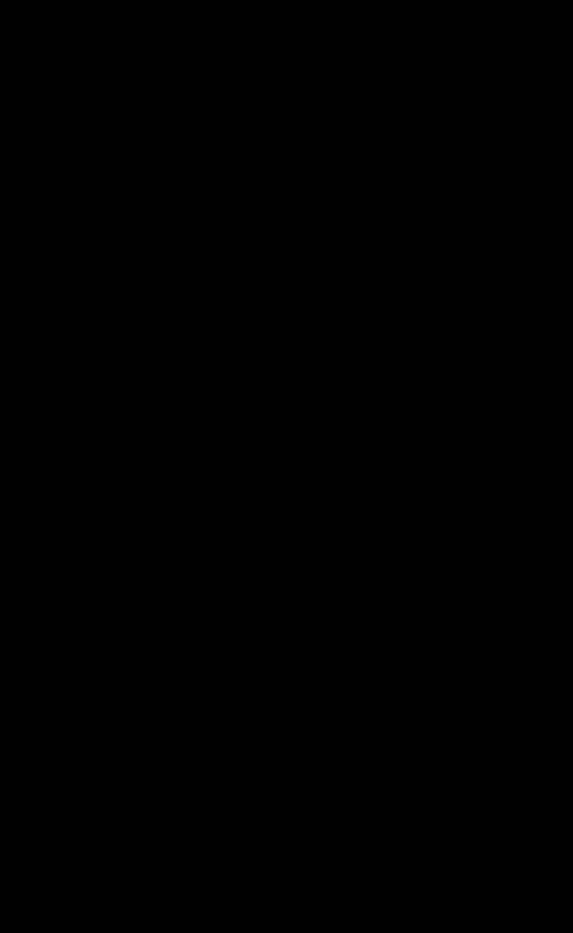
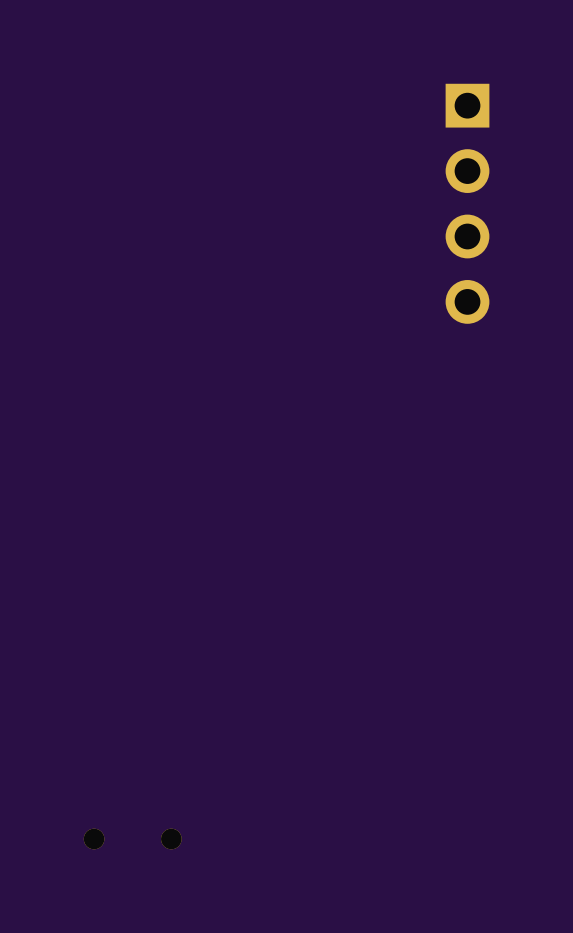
part: none -> (467, 203)
part: none -> (132, 839)

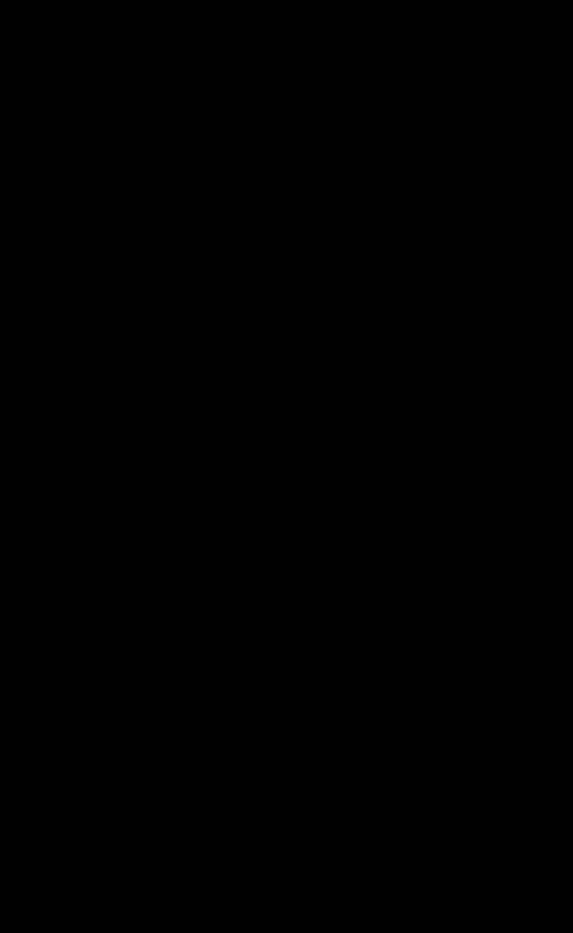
part: (467, 203) -> none
part: (132, 839) -> none

